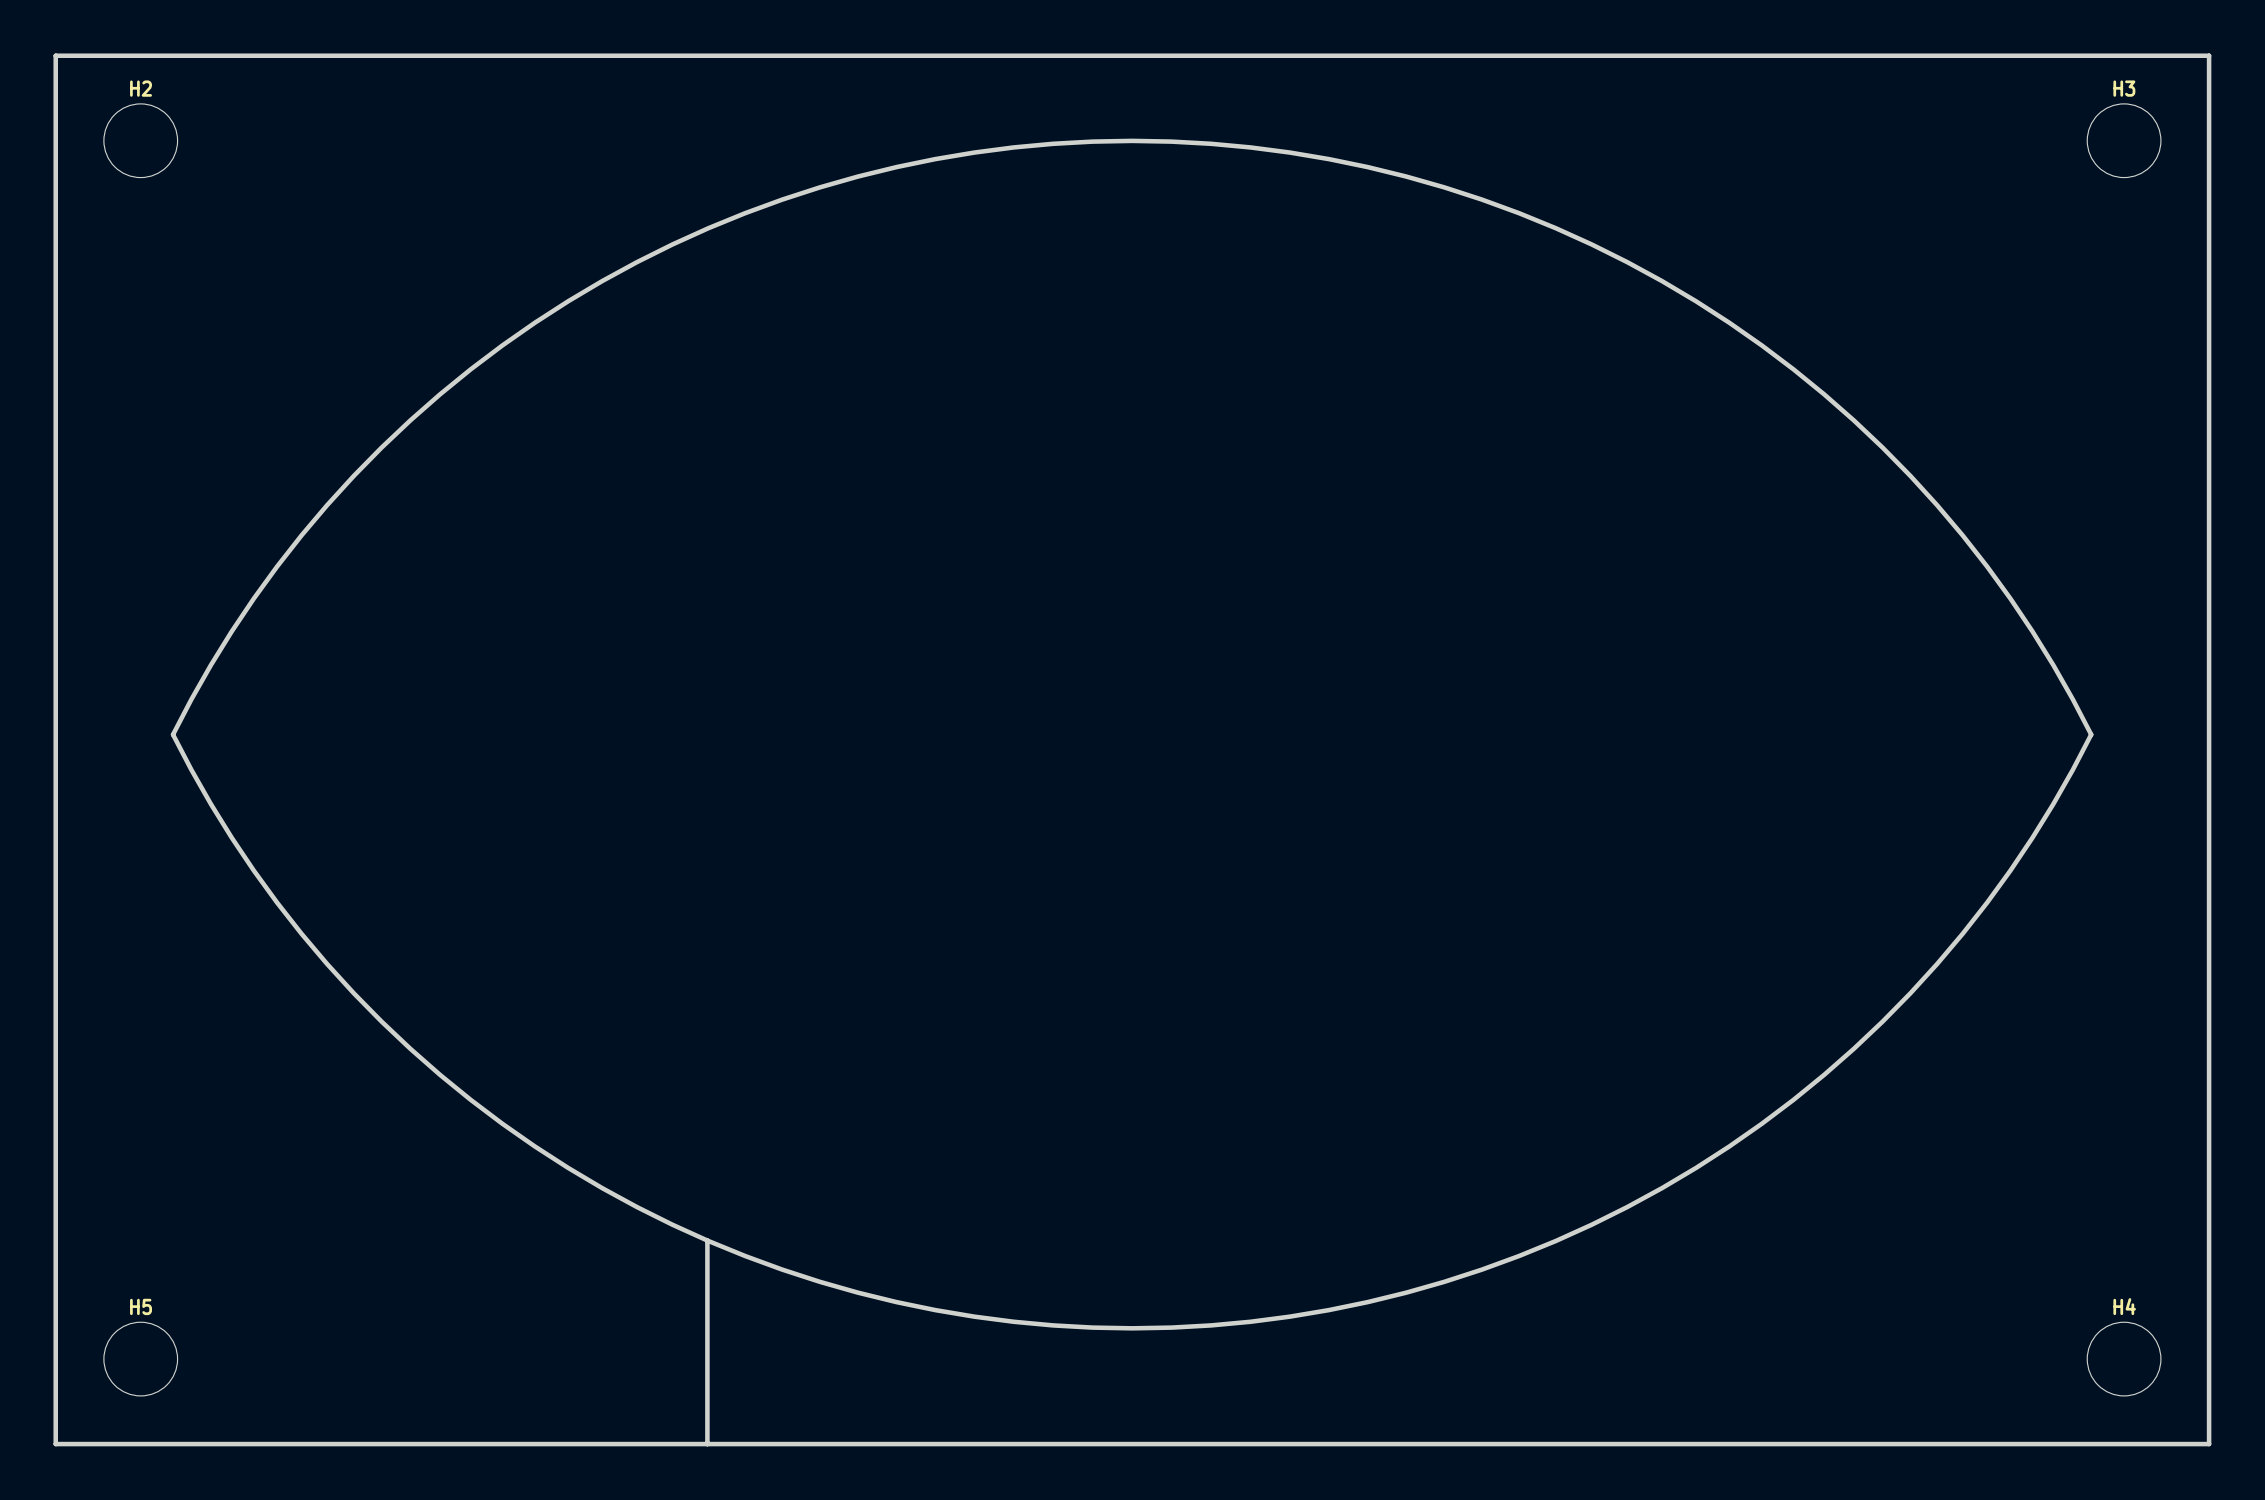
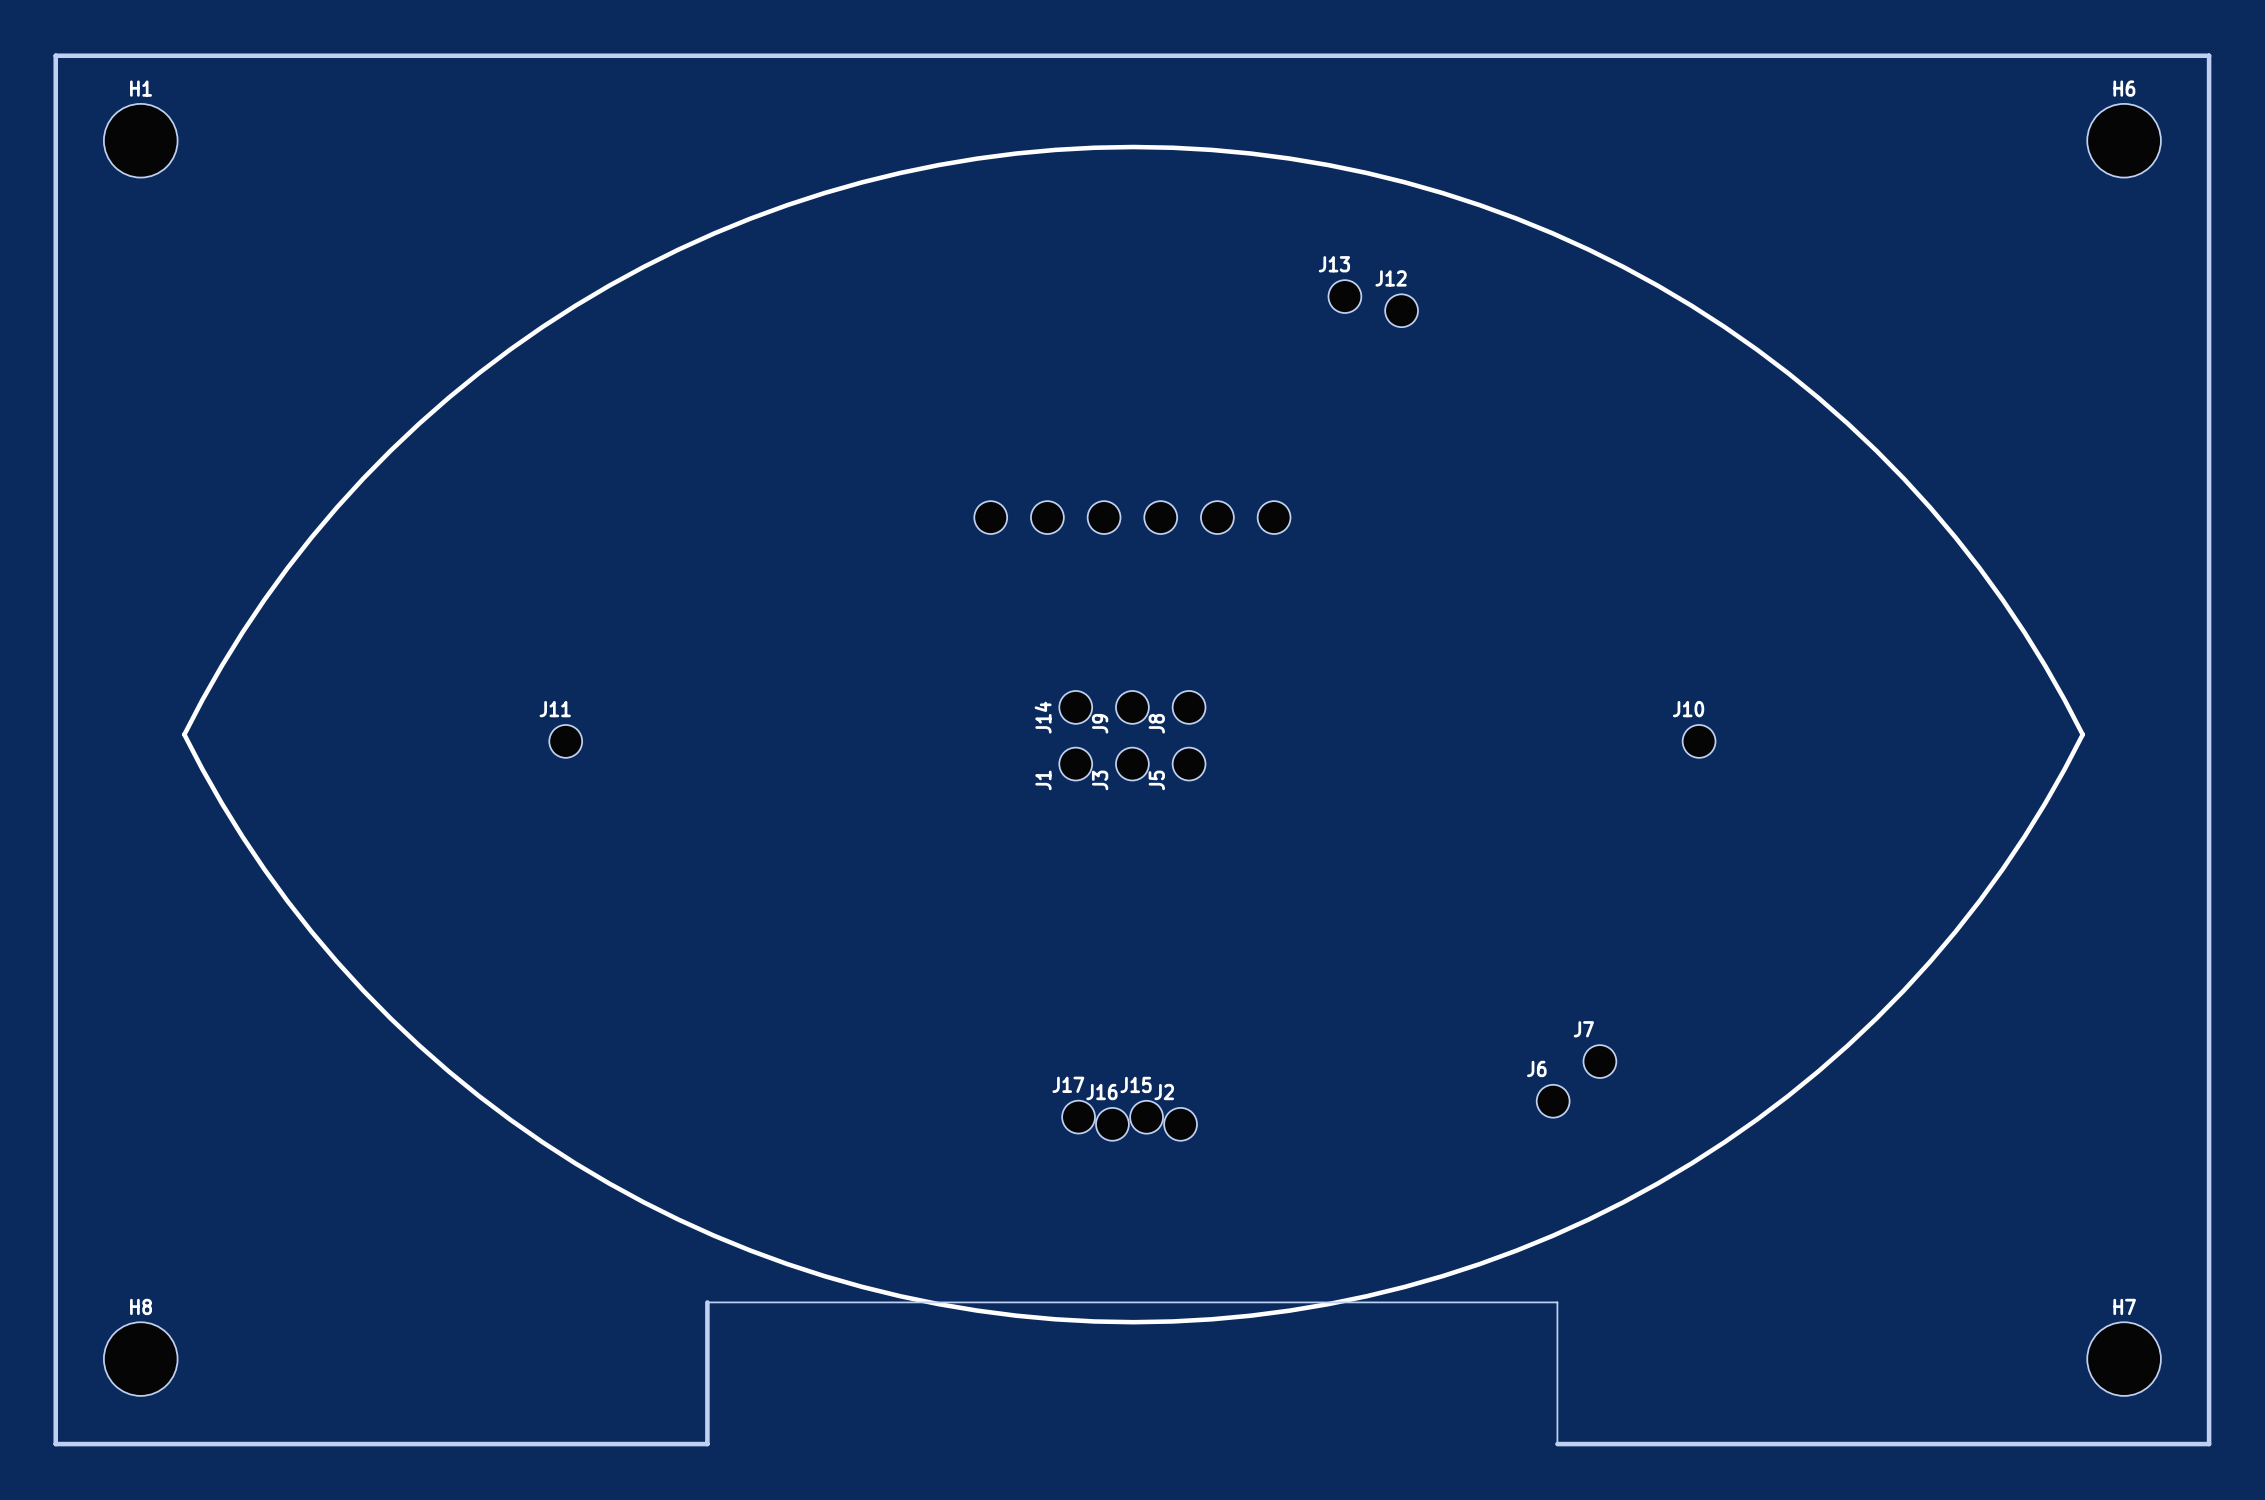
H2 name: H2 (141, 88) -> H1 (141, 88)
H3 name: H3 (2124, 88) -> H6 (2124, 88)
J13: none -> (1344, 296)
J12: none -> (1401, 310)
part: none -> (1132, 517)
J14: none -> (1075, 707)
J9: none -> (1132, 707)
J8: none -> (1189, 707)
board edge: (173, 734) (210, 665) (253, 598) (327, 505) (381, 447) (440, 394) (502, 345) (568, 301) (636, 262) (708, 228) (782, 199) (858, 176) (935, 159) (1013, 147) (1132, 140) (1250, 147) (1328, 159) (1406, 176) (1481, 199) (1555, 228) (1627, 262) (1696, 301) (1761, 345) (1824, 394) (1882, 447) (1937, 505) (2010, 598) (2053, 665) (2091, 734) (2053, 804) (2010, 870) (1937, 964) (1882, 1021) (1824, 1074) (1761, 1123) (1696, 1167) (1627, 1207) (1555, 1241) (1481, 1269) (1406, 1292) (1328, 1310) (1250, 1321) (1132, 1328) (1013, 1321) (935, 1310) (858, 1292) (782, 1269) (708, 1241) (636, 1207) (568, 1167) (502, 1123) (440, 1074) (381, 1021) (327, 964) (253, 870) (210, 804) (173, 734) -> none
line: none -> (184, 734) (221, 665) (264, 599) (336, 507) (390, 450) (448, 397) (510, 349) (575, 305) (643, 267) (714, 233) (787, 205) (862, 182) (977, 158) (1055, 149) (1133, 147) (1211, 149) (1289, 158) (1404, 182) (1479, 205) (1552, 233) (1623, 267) (1691, 305) (1756, 349) (1818, 397) (1876, 450) (1930, 507) (2002, 599) (2045, 665) (2082, 734) (2045, 803) (2002, 869) (1930, 961) (1876, 1018) (1818, 1071) (1756, 1119) (1691, 1163) (1623, 1202) (1552, 1235) (1479, 1264) (1404, 1286) (1289, 1310) (1211, 1319) (1133, 1322) (1055, 1319) (977, 1310) (862, 1286) (787, 1264) (714, 1235) (643, 1202) (575, 1163) (510, 1119) (448, 1071) (390, 1018) (336, 961) (264, 869) (221, 803) (184, 734)
J11: none -> (565, 741)
J10: none -> (1699, 741)
J1: none -> (1075, 764)
J3: none -> (1132, 764)
J5: none -> (1189, 764)
J7: none -> (1599, 1061)
J6: none -> (1553, 1101)
J17: none -> (1078, 1117)
J15: none -> (1146, 1117)
J16: none -> (1112, 1124)
J2: none -> (1180, 1124)
board edge: (707, 1240) (707, 1302) -> none
H5 name: H5 (141, 1306) -> H8 (141, 1306)
H4 name: H4 (2124, 1306) -> H7 (2124, 1306)
board edge: (707, 1444) (1557, 1444) -> (707, 1302) (1557, 1302) (1557, 1444)

